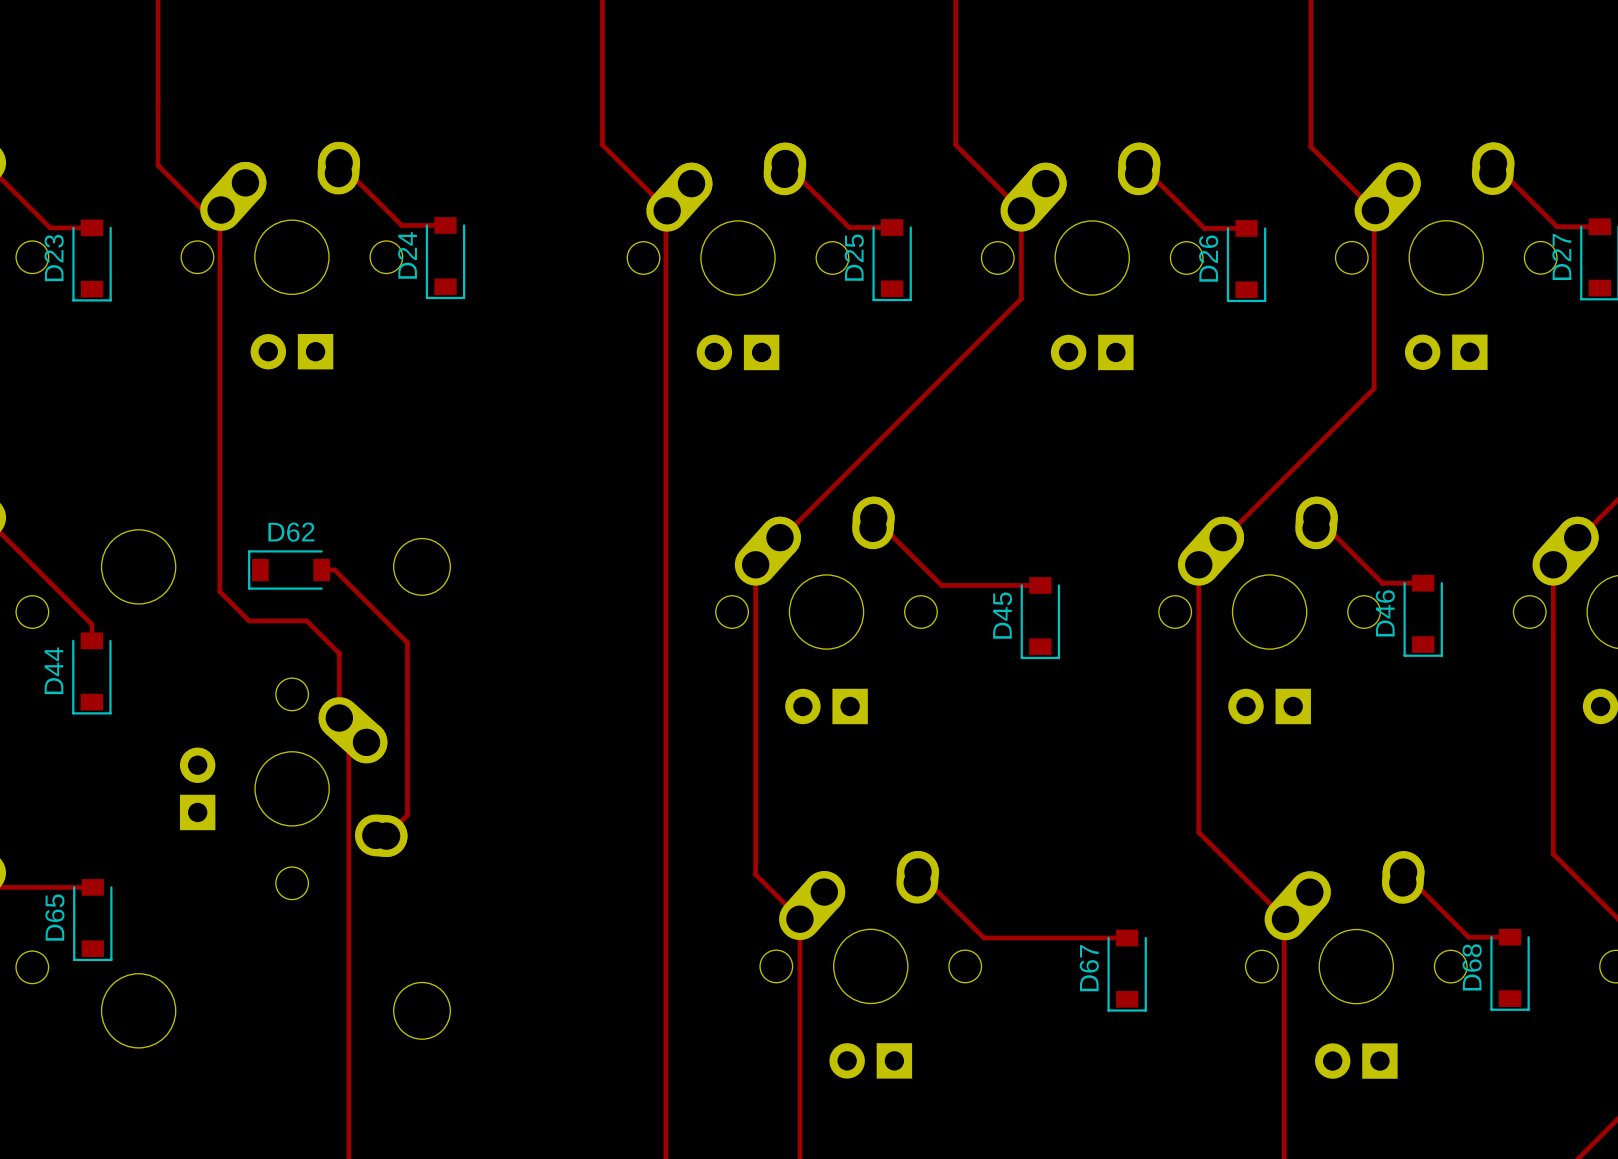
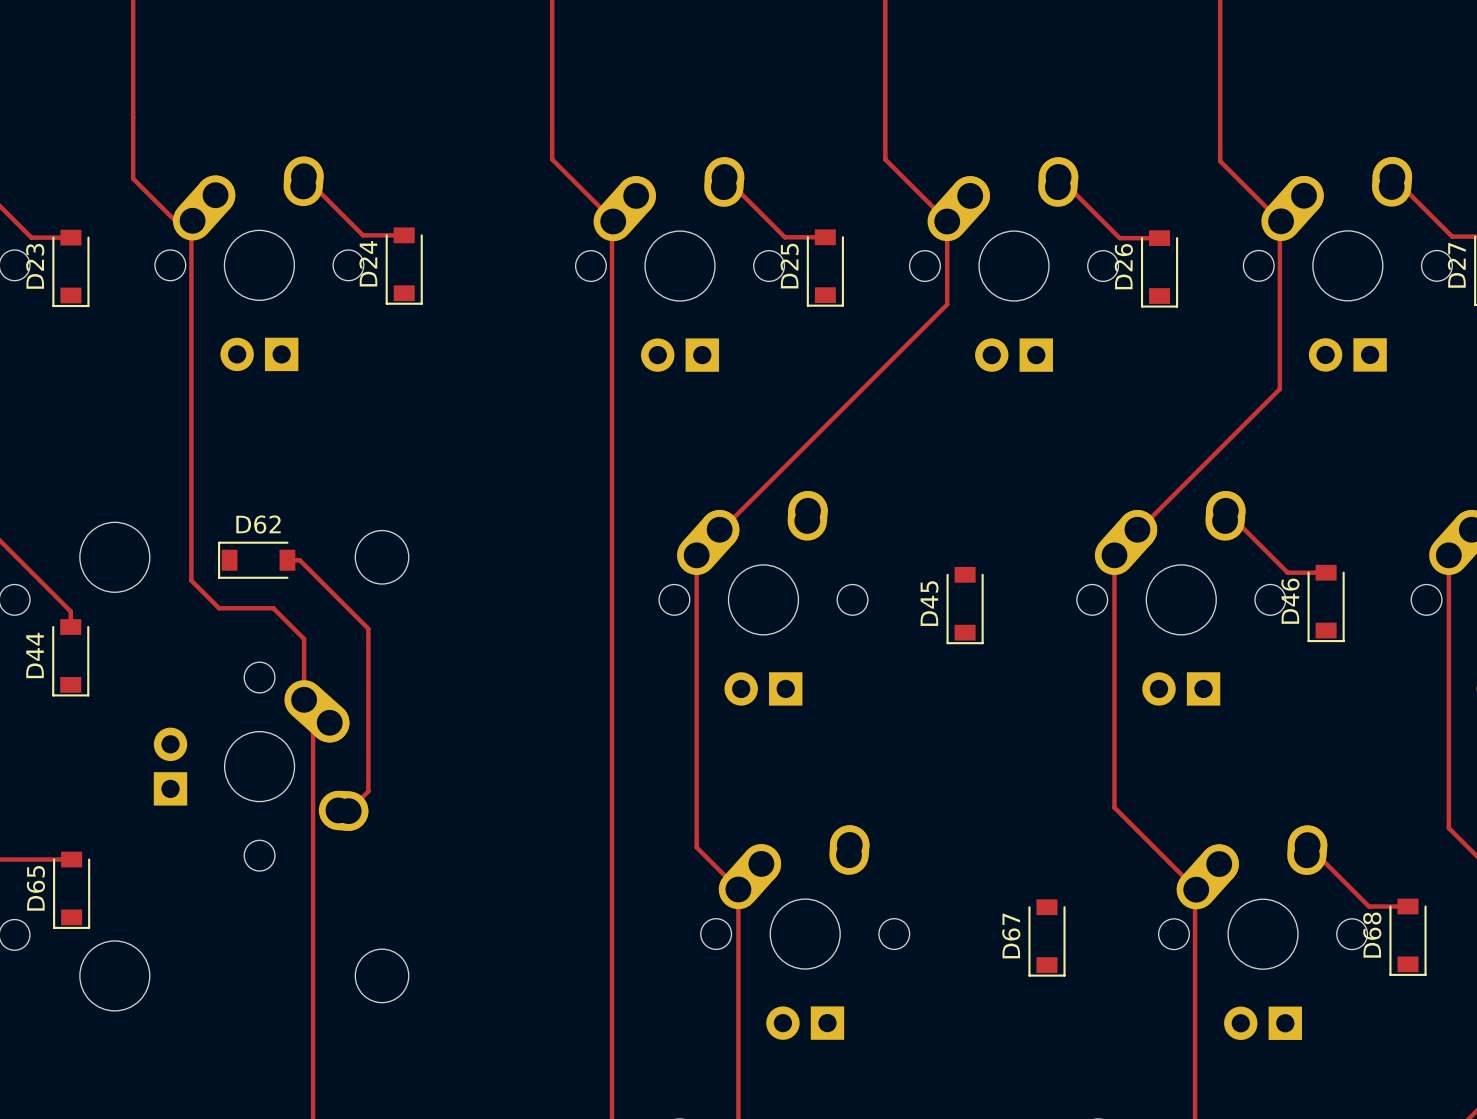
top track: (873, 517) (941, 585) (1040, 585) -> none
top track: (918, 871) (984, 937) (1127, 937) -> none

